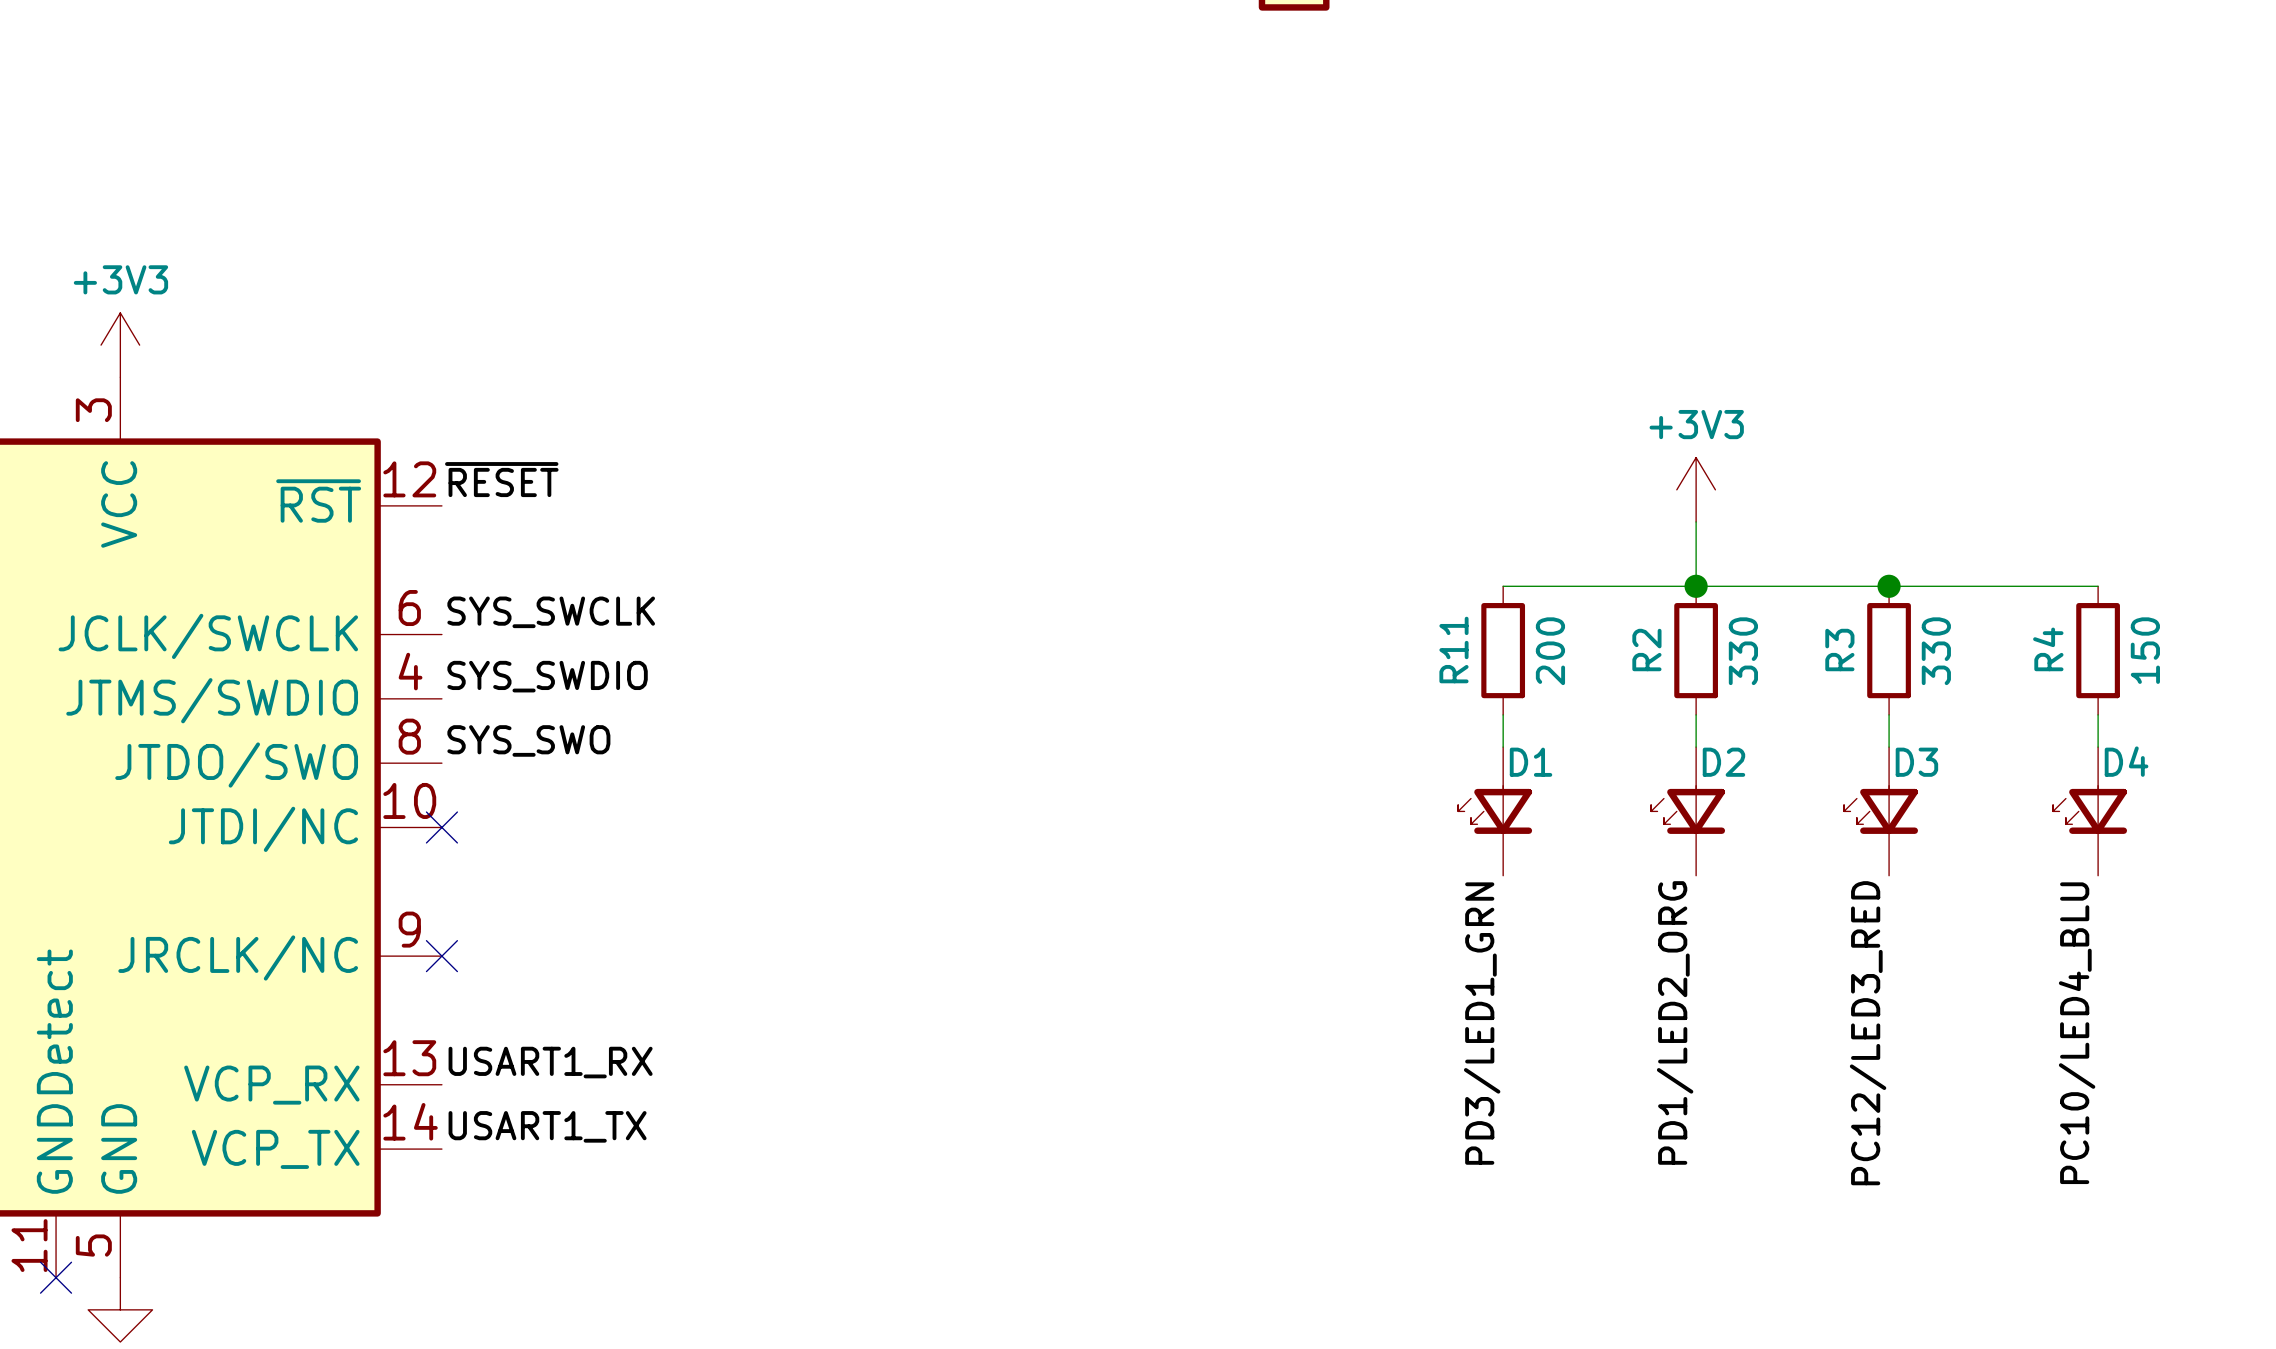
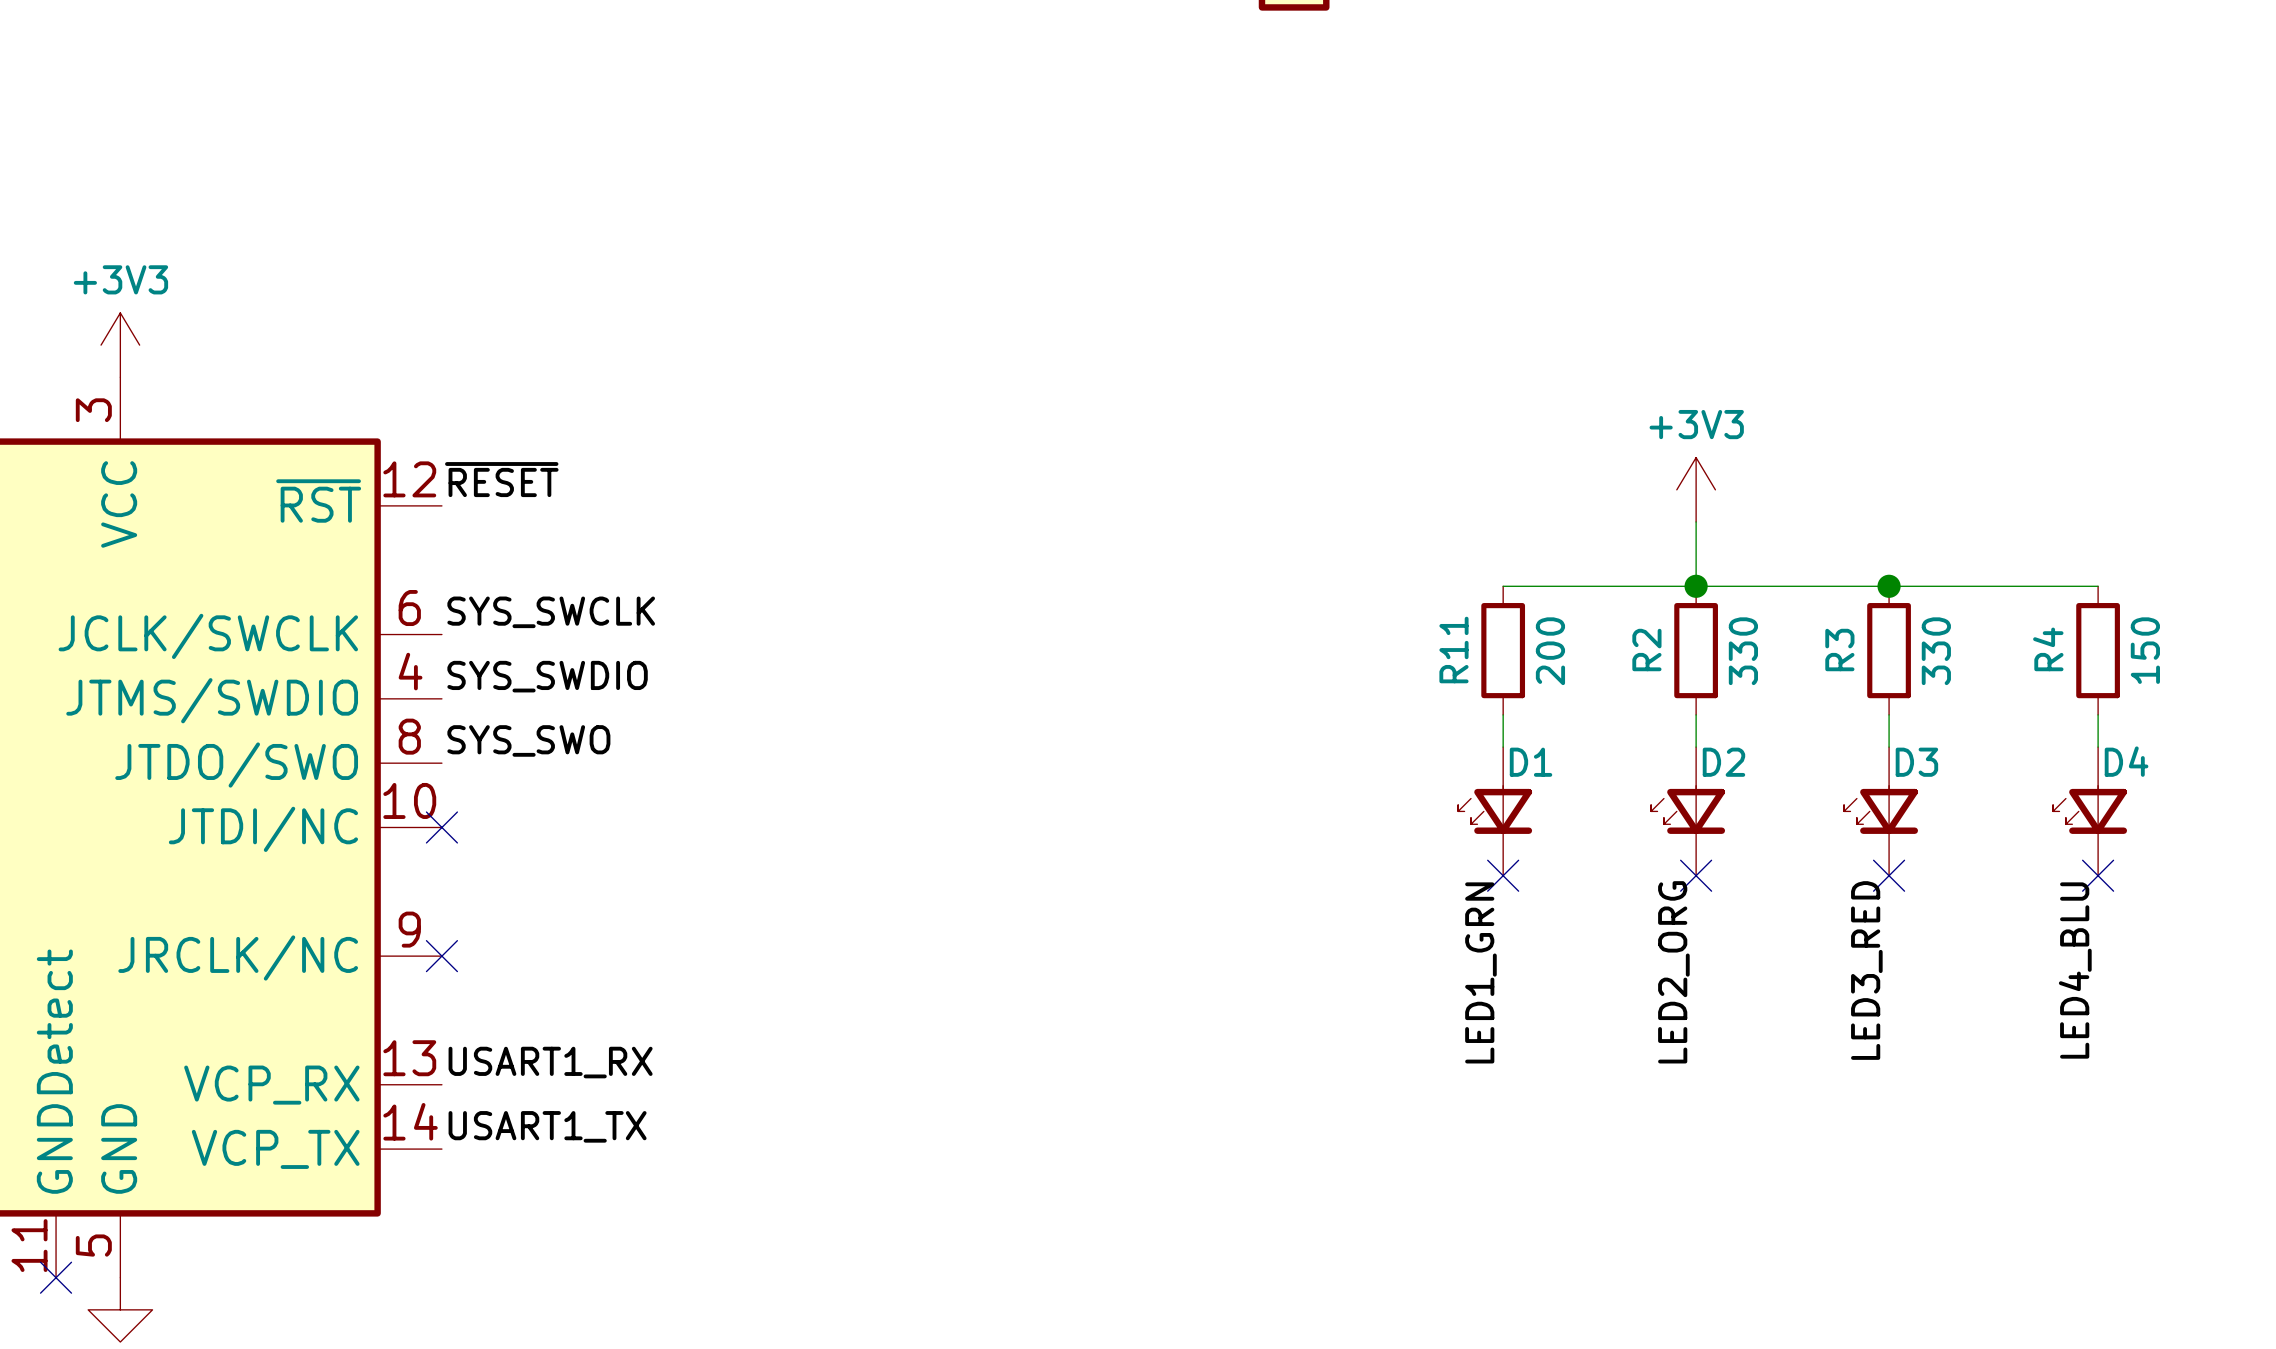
no-connect mark: none -> (1503, 875)
no-connect mark: none -> (1696, 875)
no-connect mark: none -> (1889, 875)
no-connect mark: none -> (2098, 875)
label: PD1/LED2_ORG (1675, 1022) -> LED2_ORG (1673, 972)
label: PD3/LED1_GRN (1482, 1023) -> LED1_GRN (1480, 972)
label: PC12/LED3_RED (1868, 1033) -> LED3_RED (1866, 970)
label: PC10/LED4_BLU (2077, 1033) -> LED4_BLU (2075, 970)

